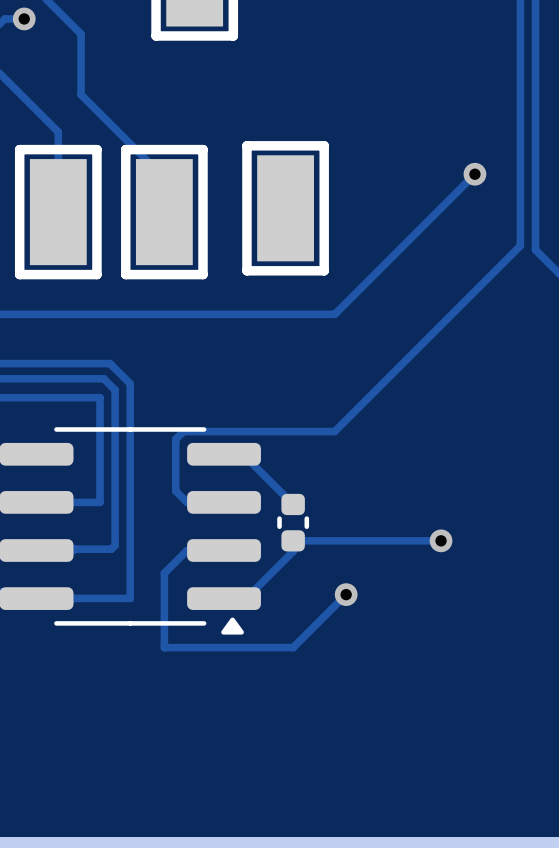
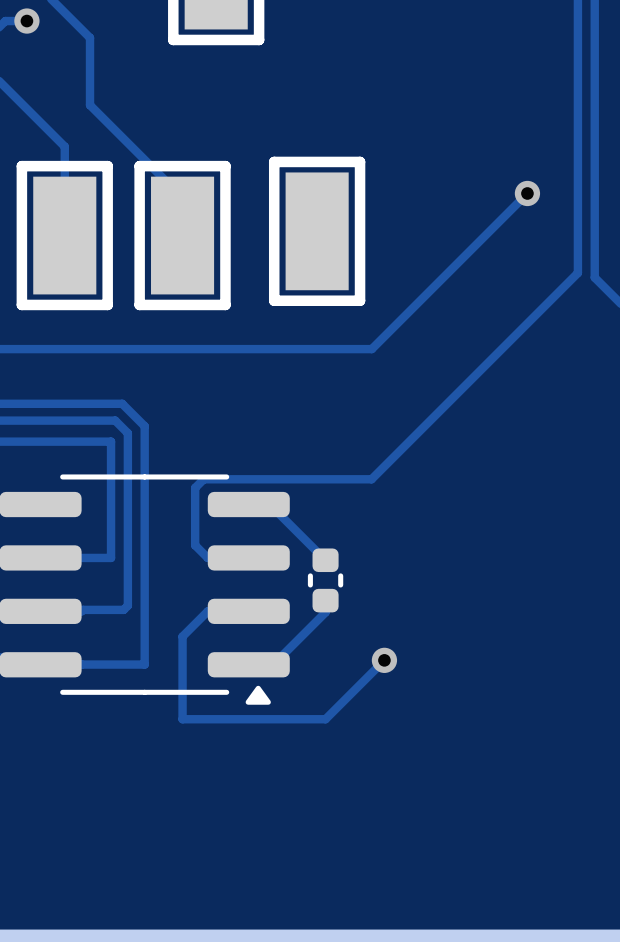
track: (293, 540) (441, 540) -> none
via: (441, 540) -> none

